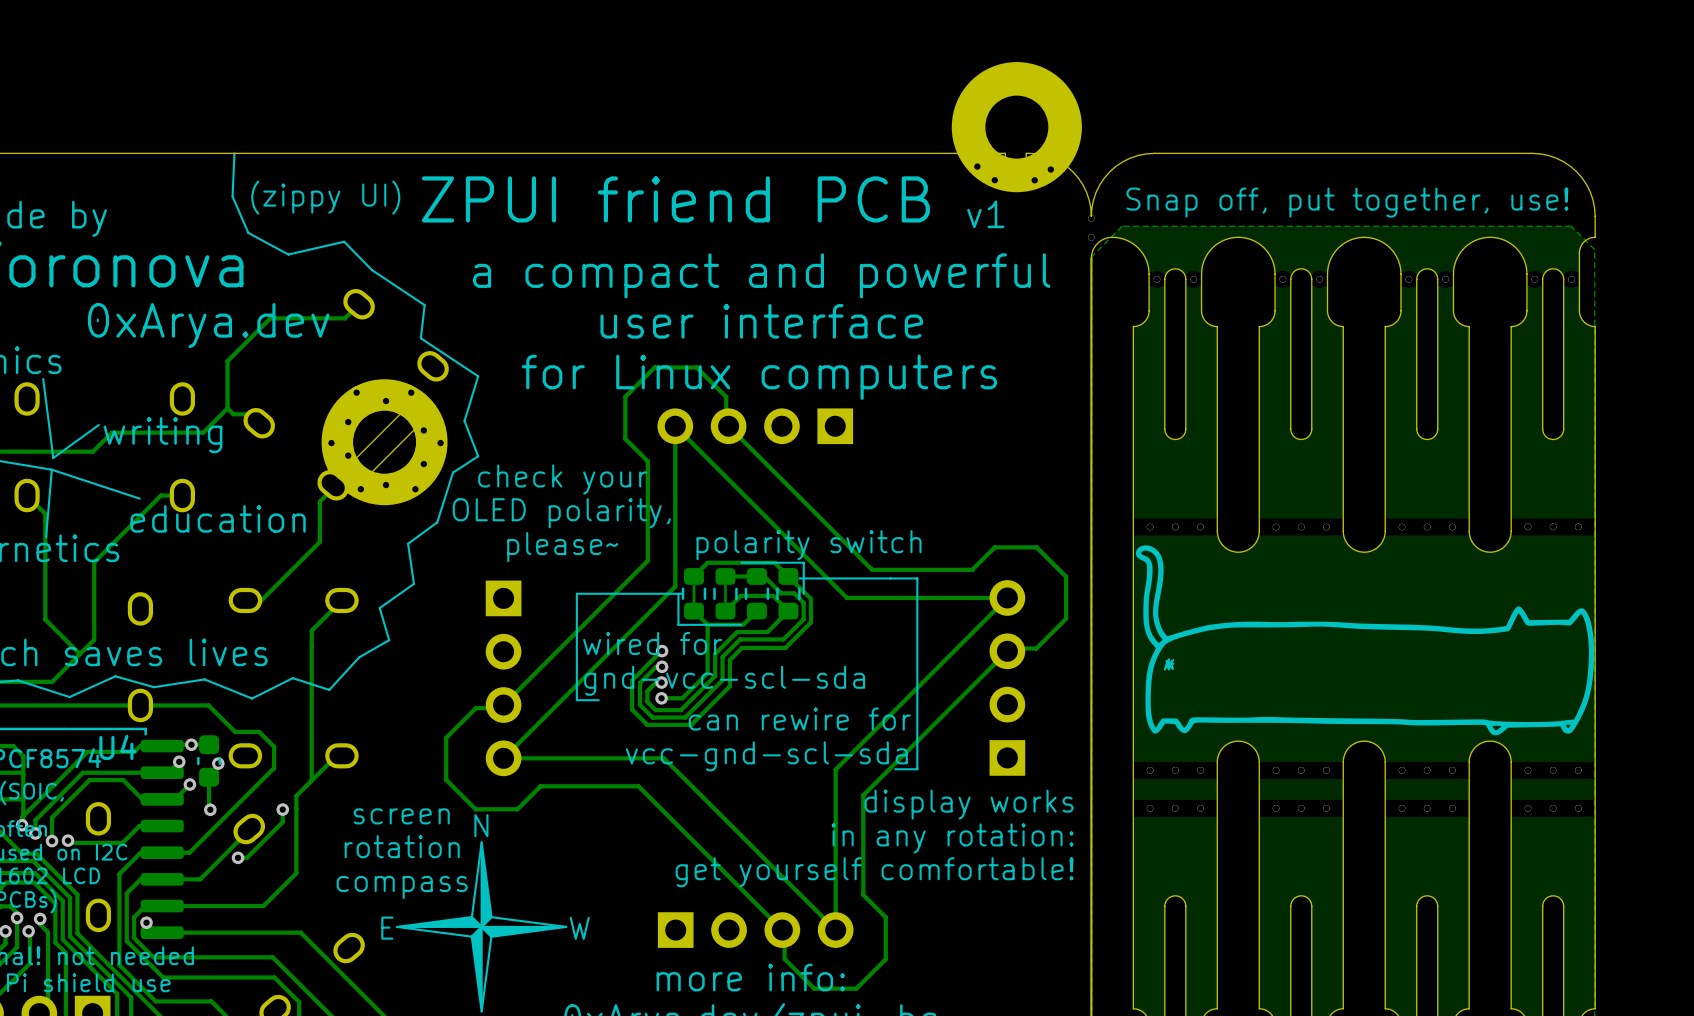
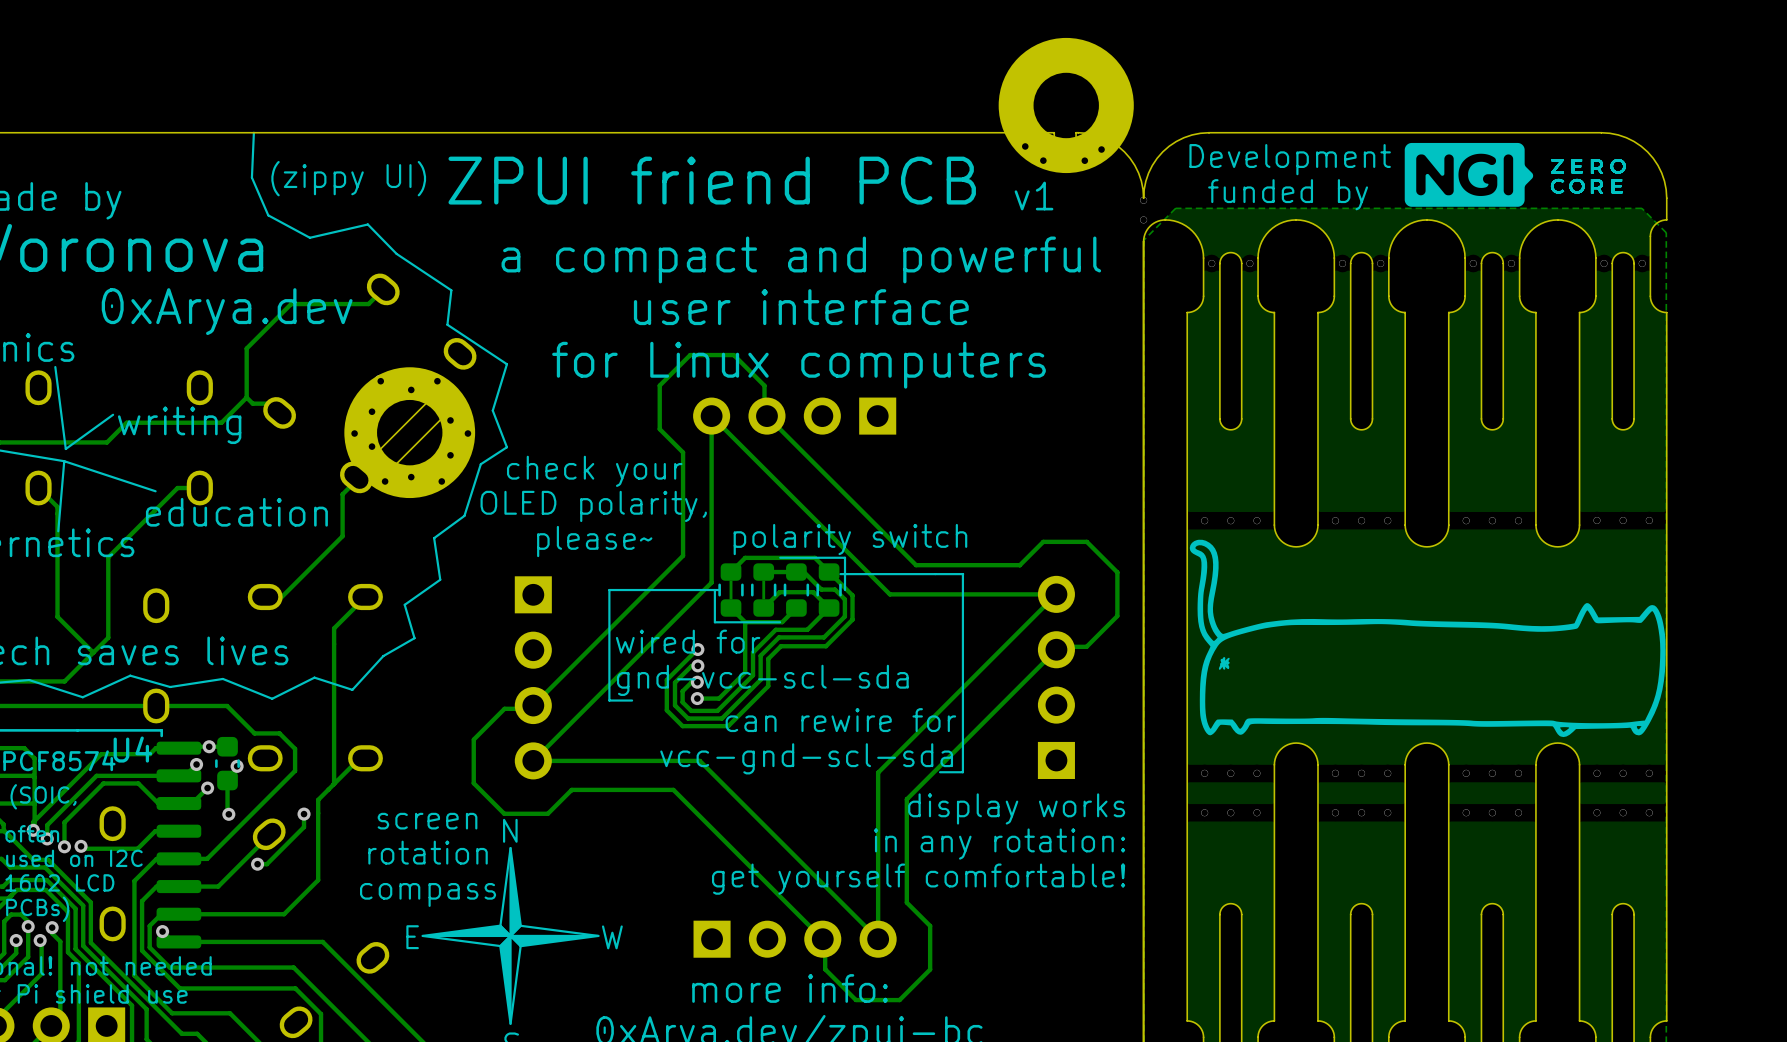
drawing: none -> [1404, 142, 1626, 207]
text: none -> Development (1290, 159)
text: Snap off, put together, use! (1347, 202) -> none
text: none -> funded by (1288, 194)

